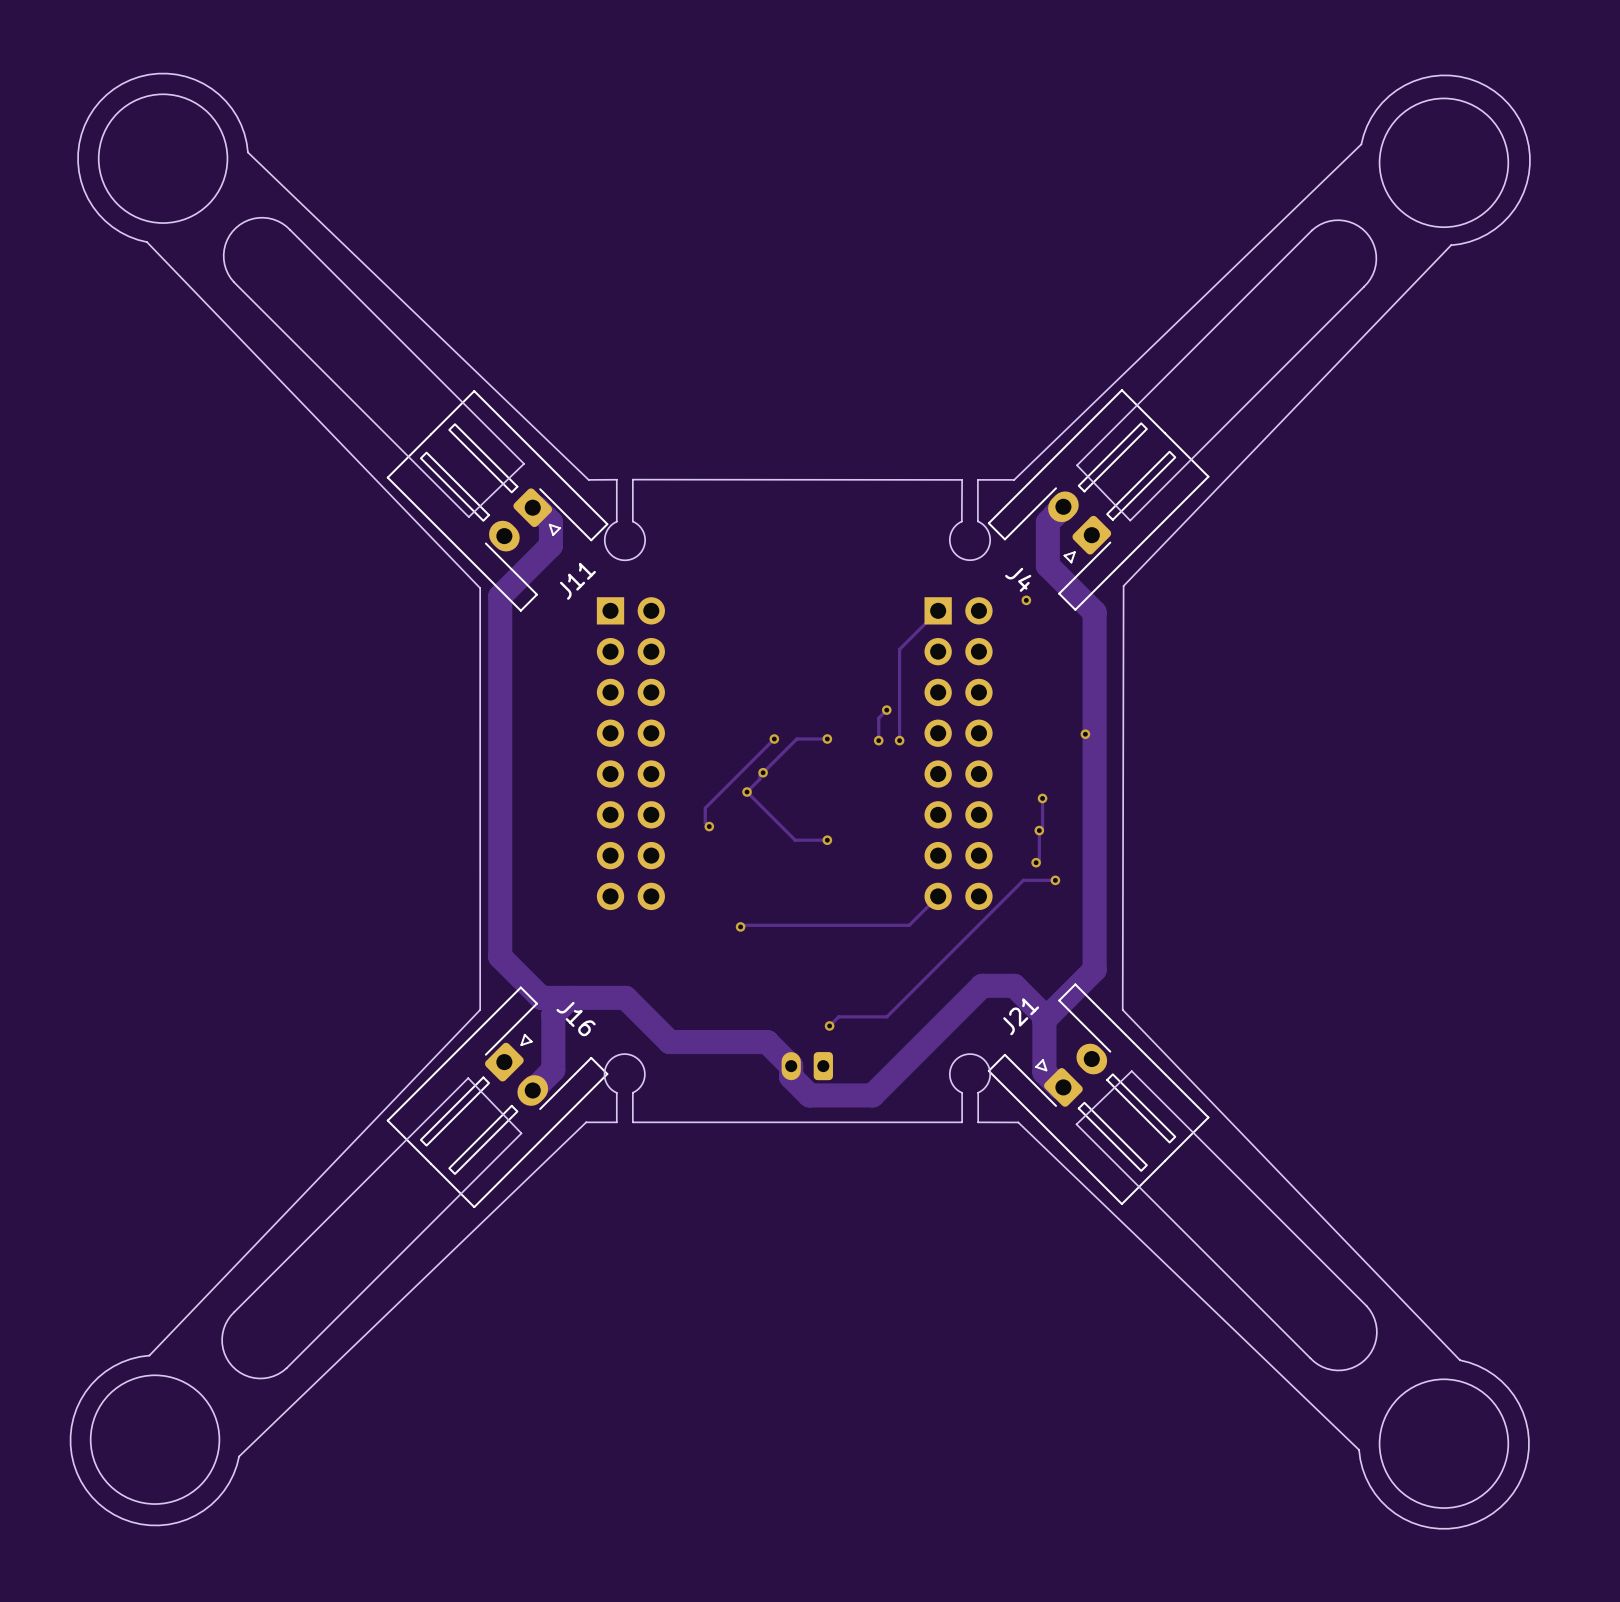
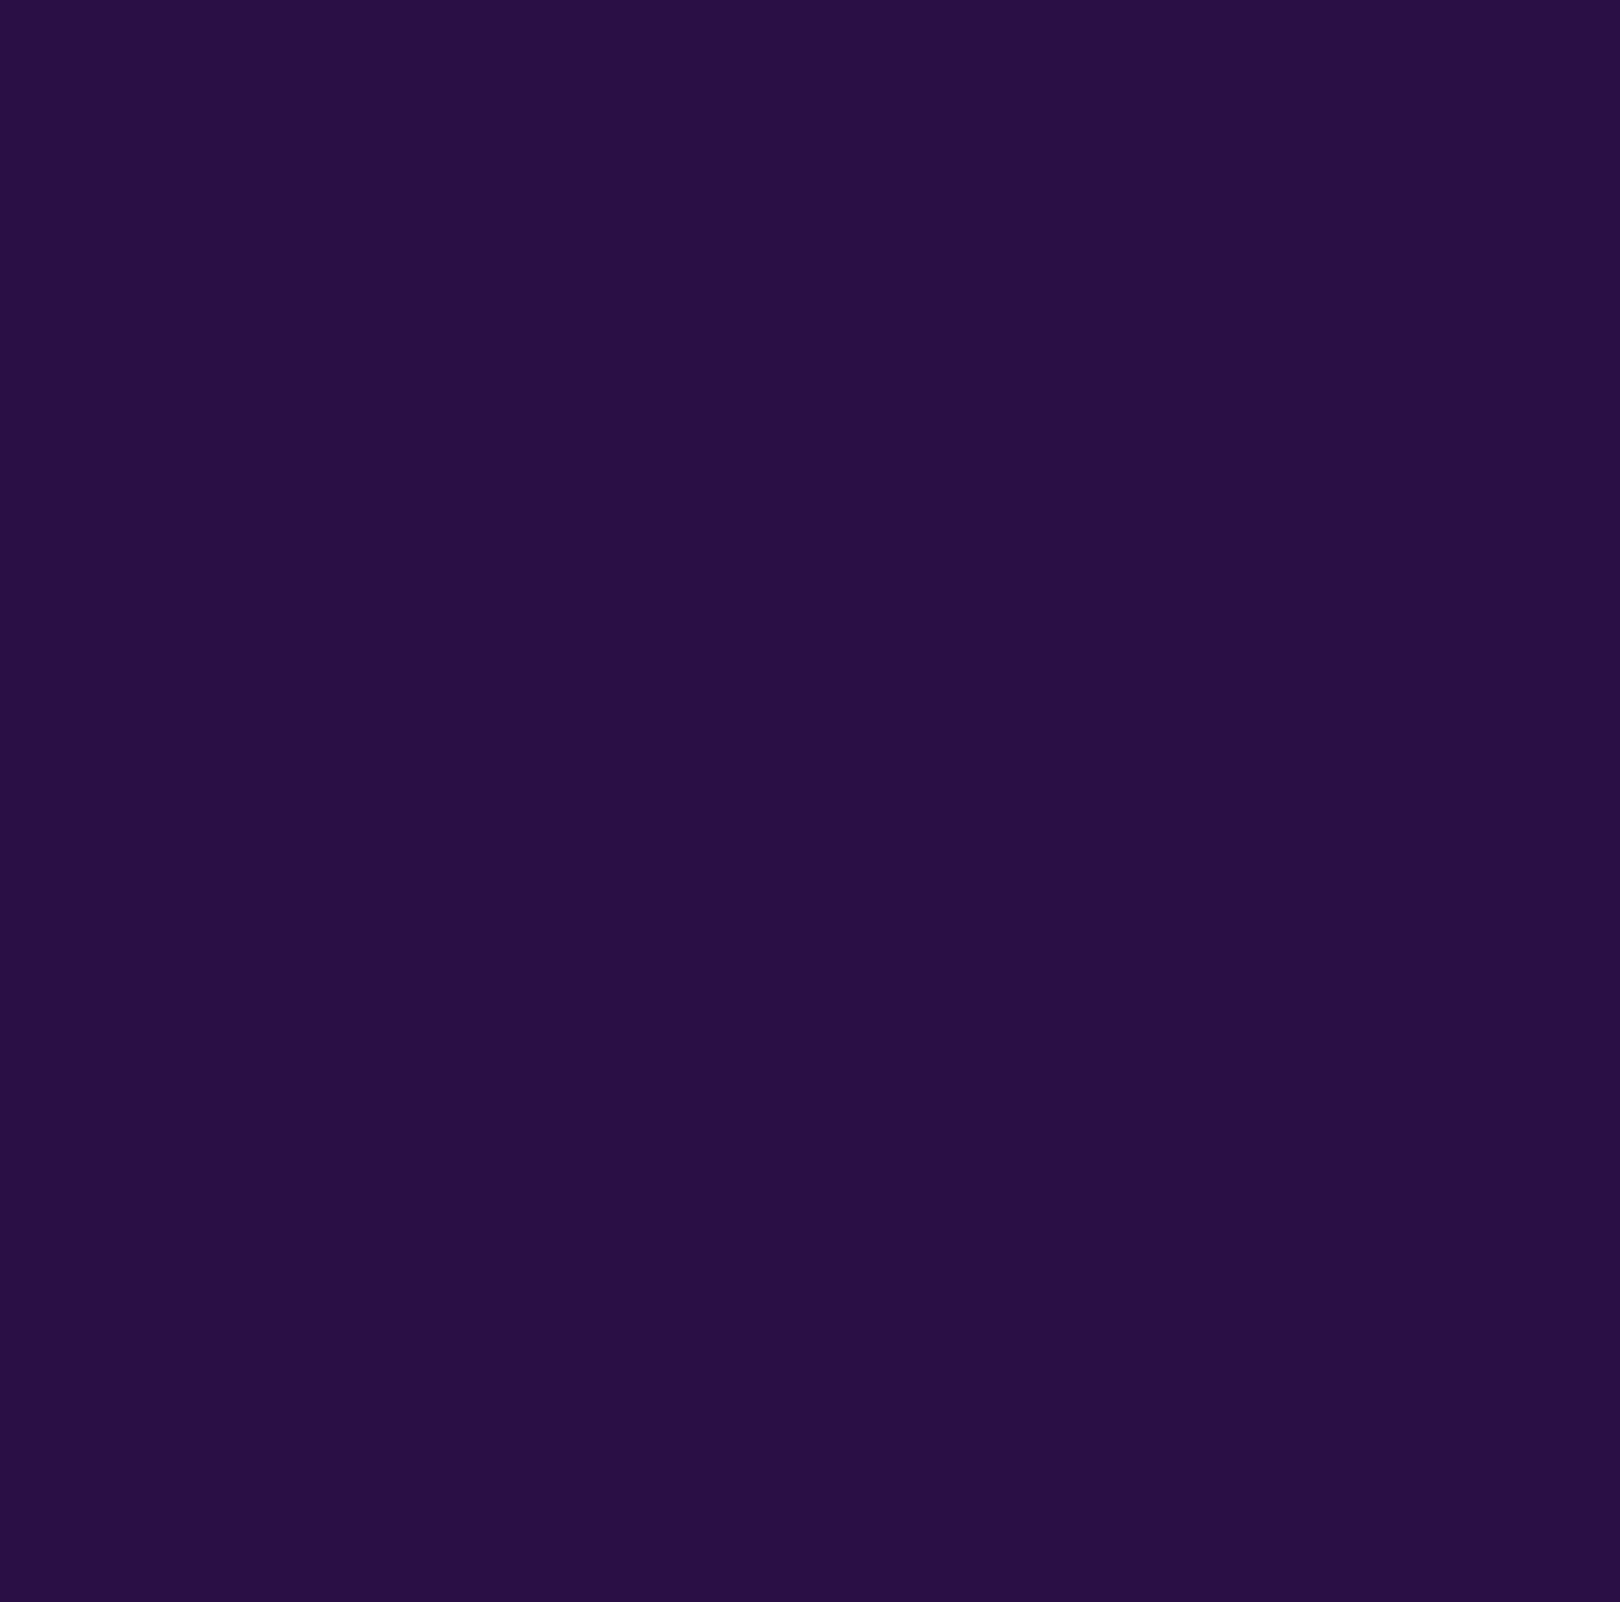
round board edge: [97, 93, 229, 224] -> none
round board edge: [1378, 97, 1510, 228] -> none
board edge: (290, 229) (524, 463) (468, 517) (230, 278) (224, 264) (224, 249) (227, 240) (235, 227) (248, 220) (263, 217) (278, 221) (290, 229) -> none
board edge: (1311, 230) (1077, 465) (1130, 520) (1370, 278) (1375, 264) (1375, 250) (1371, 240) (1362, 229) (1349, 221) (1334, 220) (1320, 224) (1311, 230) -> none
board edge: (1014, 479) (977, 479) (977, 521) (987, 529) (990, 542) (984, 554) (977, 558) (970, 560) (962, 558) (955, 554) (950, 542) (952, 530) (961, 521) (962, 479) (632, 479) (632, 521) (642, 530) (644, 542) (642, 550) (635, 557) (625, 560) (617, 558) (609, 552) (604, 540) (608, 528) (616, 521) (616, 479) (588, 479) (247, 152) (241, 124) (231, 108) (219, 94) (203, 83) (186, 76) (158, 73) (139, 76) (121, 84) (99, 101) (84, 125) (78, 153) (79, 171) (84, 190) (98, 214) (120, 232) (147, 242) (480, 588) (480, 1009) (149, 1355) (130, 1359) (113, 1366) (98, 1377) (85, 1391) (73, 1417) (70, 1445) (73, 1464) (81, 1481) (98, 1503) (114, 1514) (131, 1522) (159, 1525) (187, 1519) (211, 1504) (229, 1482) (239, 1456) (586, 1122) (616, 1122) (616, 1092) (607, 1084) (604, 1071) (607, 1064) (612, 1058) (624, 1054) (636, 1058) (642, 1063) (644, 1071) (642, 1084) (632, 1092) (632, 1122) (962, 1122) (962, 1092) (952, 1084) (949, 1076) (950, 1069) (955, 1060) (962, 1055) (972, 1054) (979, 1056) (987, 1063) (990, 1073) (986, 1086) (978, 1092) (978, 1122) (1018, 1122) (1359, 1449) (1365, 1477) (1375, 1493) (1387, 1507) (1403, 1518) (1420, 1525) (1448, 1528) (1467, 1525) (1485, 1518) (1507, 1500) (1522, 1476) (1527, 1458) (1528, 1439) (1522, 1412) (1508, 1388) (1486, 1370) (1459, 1360) (1122, 1009) (1123, 586) (1451, 245) (1478, 238) (1494, 229) (1508, 216) (1523, 192) (1529, 164) (1526, 136) (1514, 111) (1501, 97) (1486, 86) (1459, 76) (1441, 75) (1422, 78) (1396, 90) (1382, 102) (1371, 117) (1361, 144) (1014, 479) -> none
J4: (1098, 499) -> none
J11: (497, 500) -> none
track: (1063, 506) (1047, 522) (1047, 565) (1094, 612) (1094, 969) (1044, 1019) -> none
track: (532, 507) (536, 507) (550, 522) (550, 545) (500, 596) (500, 956) (541, 997) (625, 997) (669, 1042) (767, 1042) (791, 1066) (791, 1077) (809, 1095) (872, 1095) (982, 985) (1014, 985) (1044, 1015) (1044, 1072) (1059, 1087) (1063, 1087) -> none
via: (1026, 600) -> none
track: (938, 610) (899, 649) (899, 740) -> none
track: (886, 710) (878, 718) (878, 740) -> none
via: (886, 710) -> none
via: (1085, 734) -> none
track: (774, 739) (705, 808) (705, 822) (709, 826) -> none
via: (774, 739) -> none
track: (827, 739) (796, 739) (759, 775) (759, 779) (747, 792) (795, 840) (827, 840) -> none
via: (827, 739) -> none
via: (878, 740) -> none
via: (899, 740) -> none
part: (630, 753) -> none
part: (958, 753) -> none
via: (763, 772) -> none
via: (747, 792) -> none
track: (1042, 798) (1042, 827) (1039, 830) (1039, 859) (1036, 862) -> none
via: (1042, 798) -> none
via: (709, 826) -> none
via: (1039, 830) -> none
via: (827, 840) -> none
via: (1036, 862) -> none
track: (1055, 880) (1023, 880) (886, 1016) (838, 1016) (829, 1025) -> none
via: (1055, 880) -> none
track: (938, 896) (909, 925) (742, 925) (740, 926) -> none
via: (740, 926) -> none
track: (570, 997) (553, 1014) (553, 1069) (532, 1090) -> none
via: (829, 1025) -> none
part: (807, 1066) -> none
board edge: (1131, 1071) (1076, 1124) (1314, 1361) (1322, 1367) (1337, 1370) (1351, 1368) (1360, 1363) (1371, 1352) (1376, 1338) (1375, 1323) (1369, 1309) (1131, 1071) -> none
board edge: (468, 1078) (521, 1133) (286, 1368) (273, 1376) (259, 1378) (244, 1375) (235, 1369) (226, 1358) (222, 1343) (223, 1328) (230, 1315) (468, 1078) -> none
J21: (1098, 1094) -> none
J16: (497, 1097) -> none
round board edge: [89, 1374, 221, 1505] -> none
round board edge: [1378, 1378, 1510, 1509] -> none

